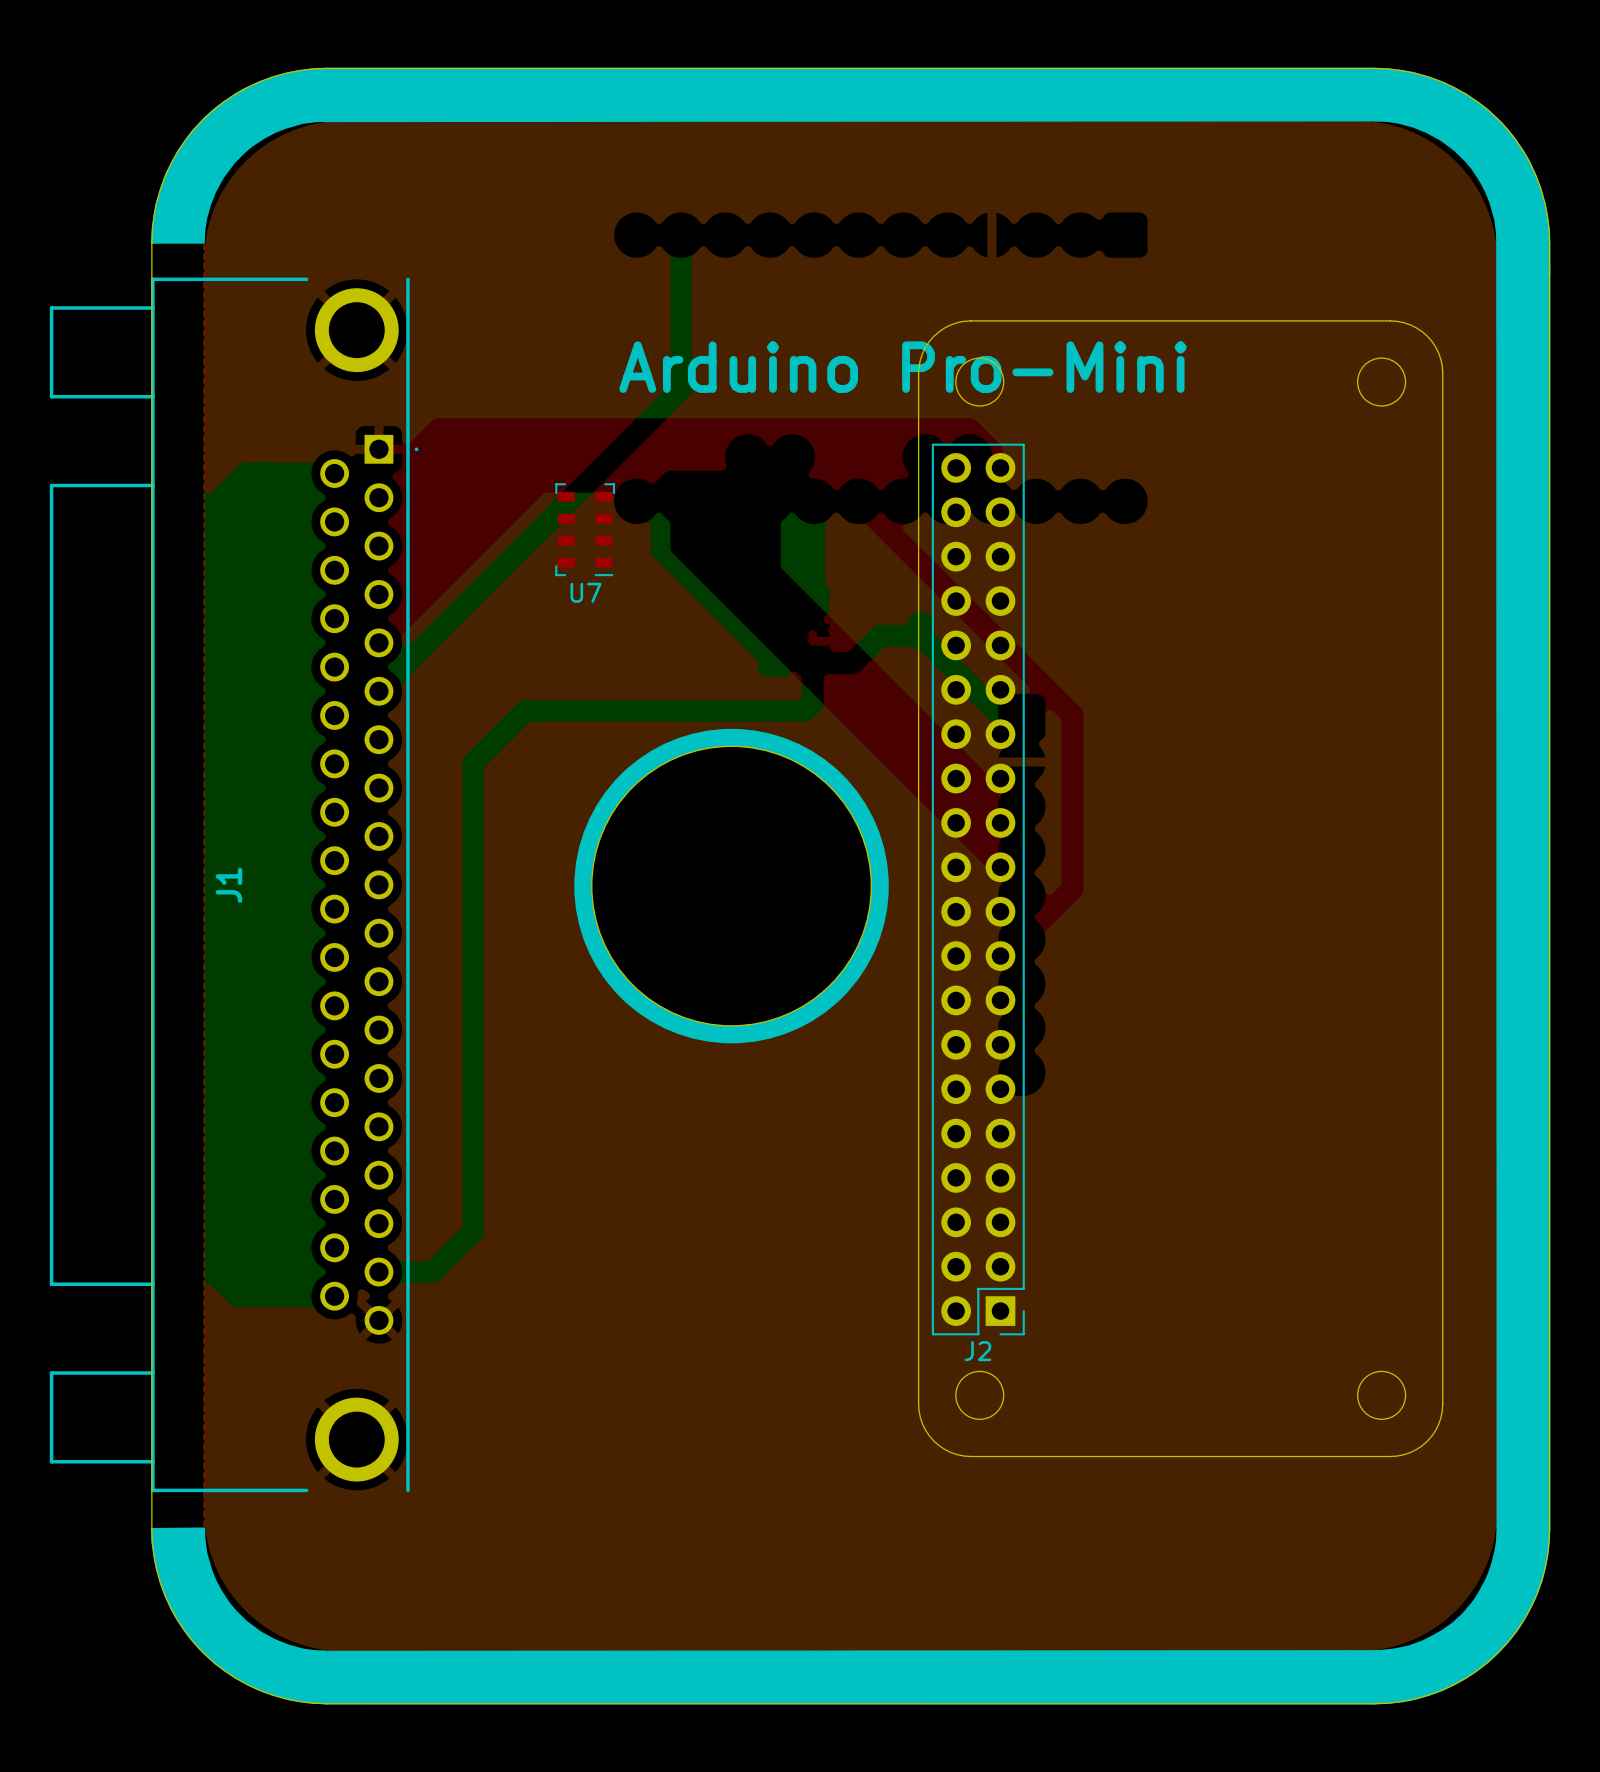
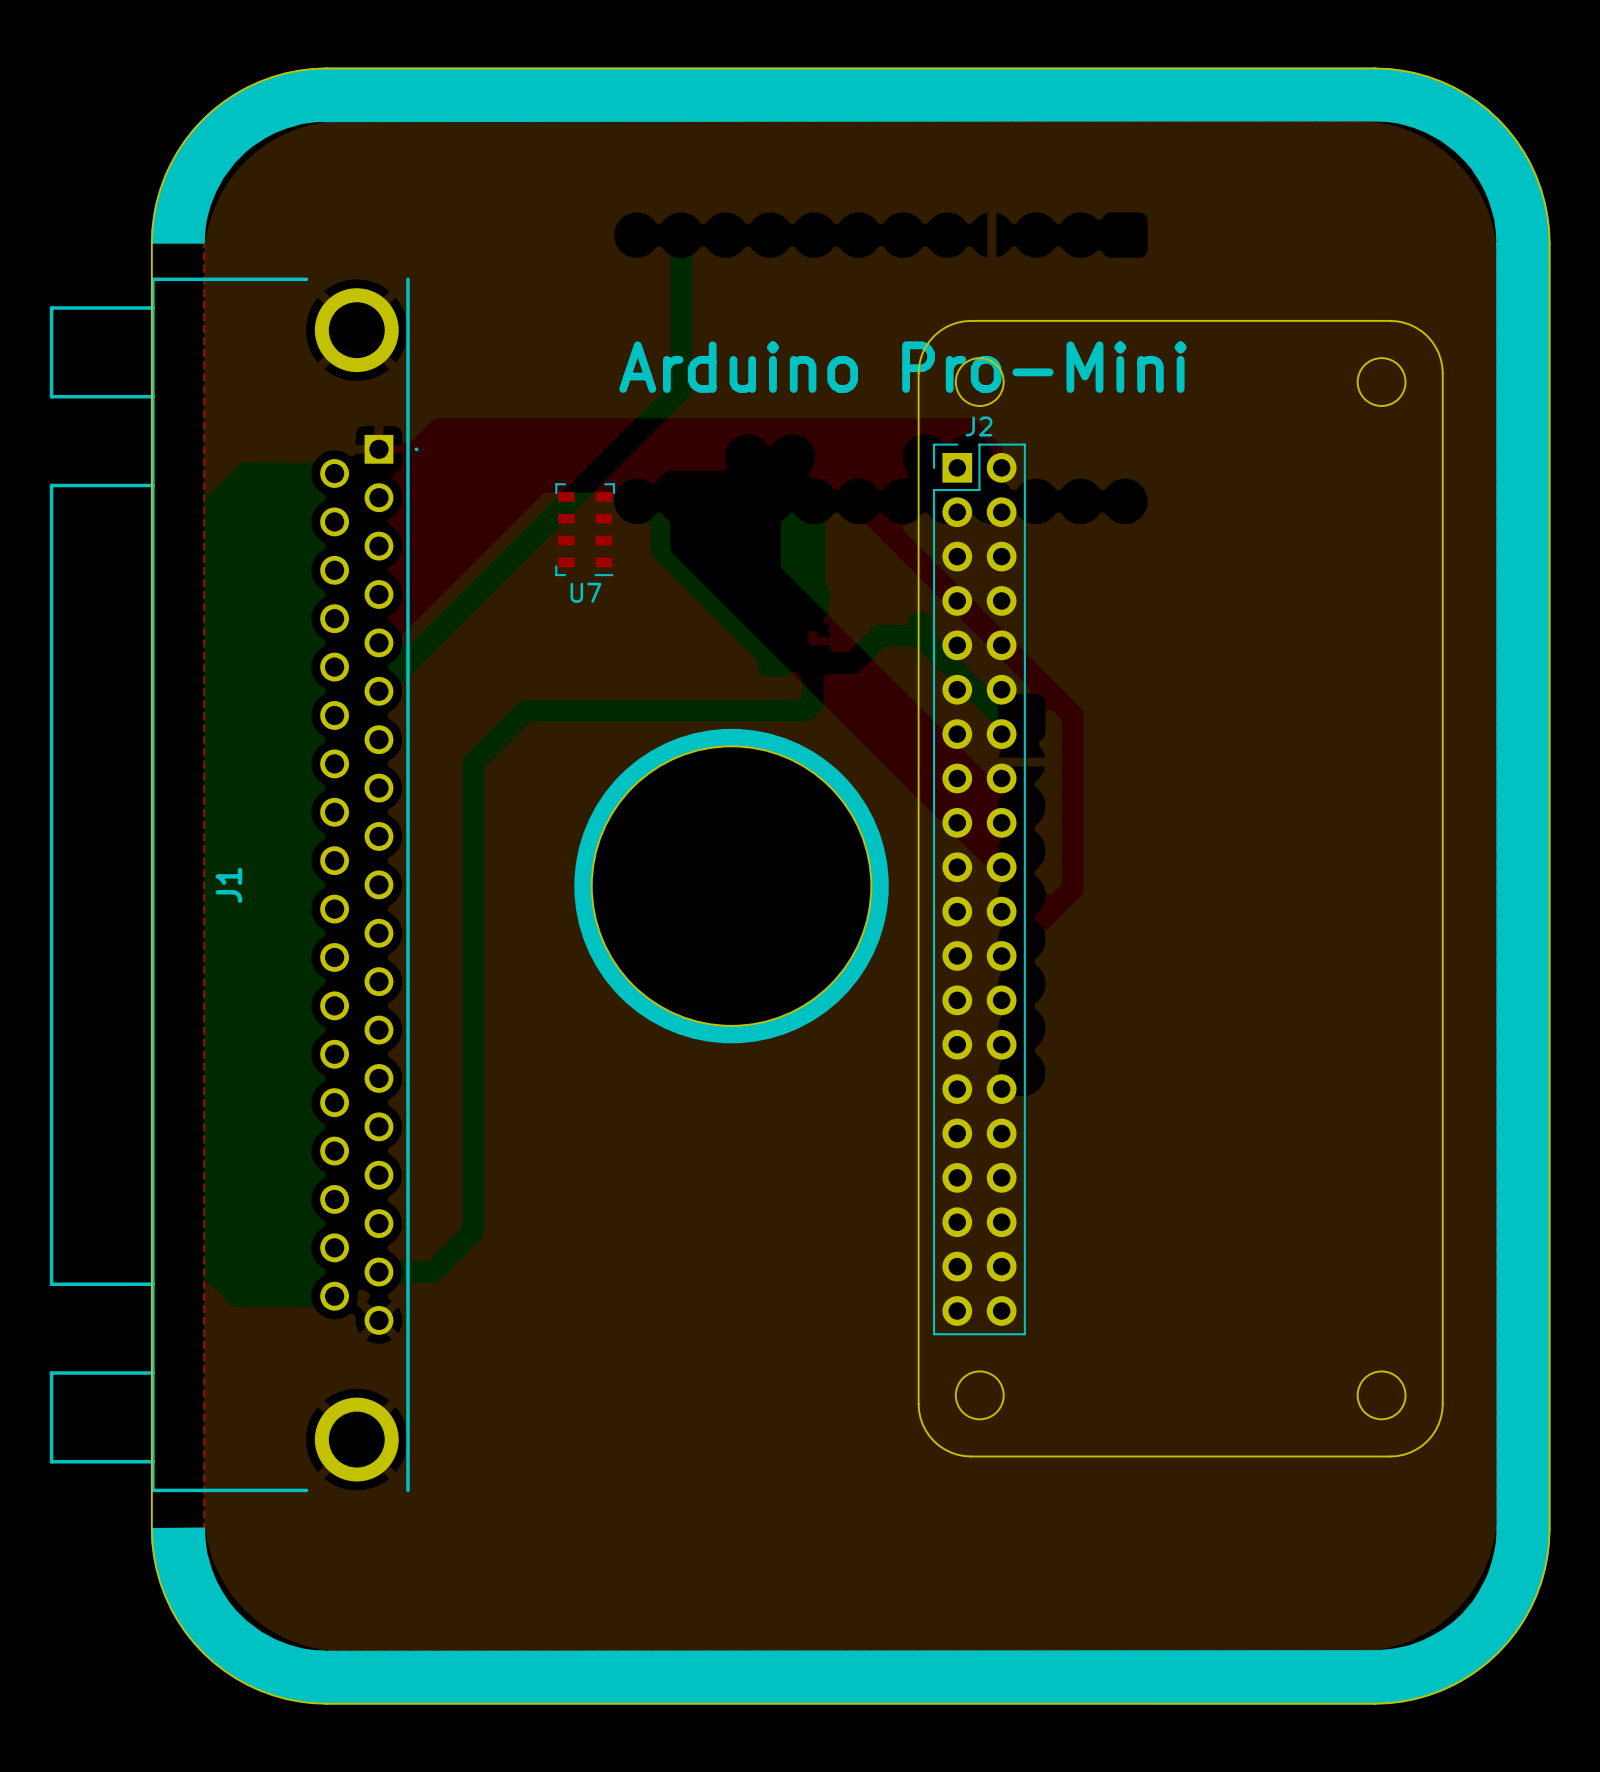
J2 rotation: 0° (978, 889) -> 180° (979, 889)

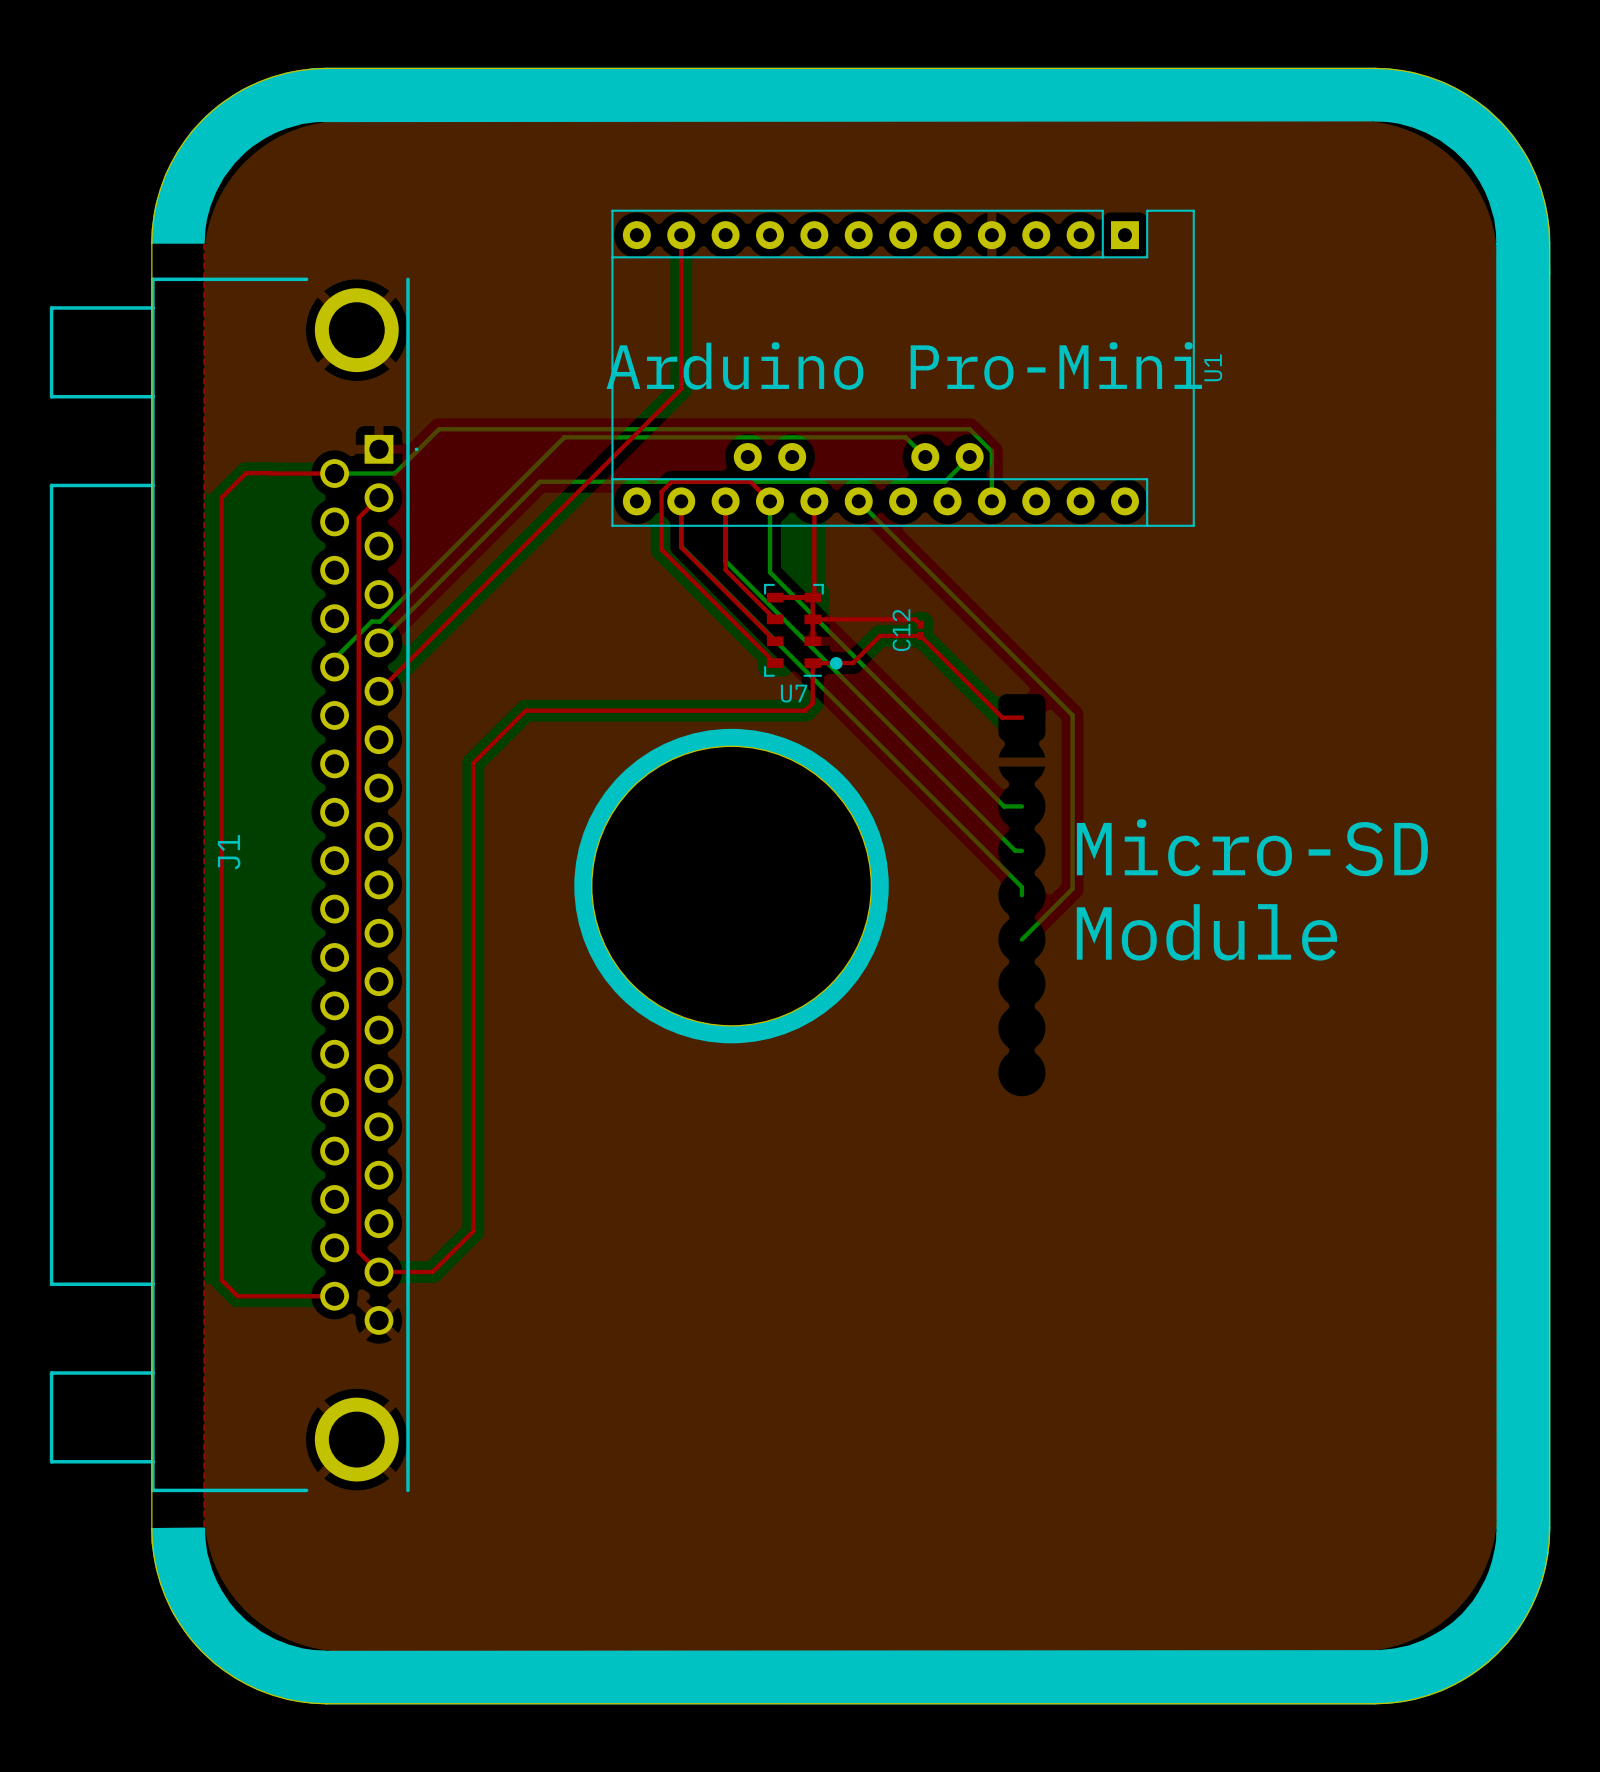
top track: none -> (681, 235) (681, 388) (378, 691)
board edge: (971, 320) (1397, 321) (1410, 324) (1422, 331) (1431, 341) (1438, 353) (1442, 373) (1442, 1404) (1440, 1417) (1431, 1436) (1422, 1445) (1410, 1452) (1390, 1456) (971, 1456) (950, 1452) (939, 1445) (929, 1436) (922, 1424) (918, 1404) (918, 373) (922, 353) (933, 336) (950, 324) (971, 320) -> none
round board edge: [955, 357, 1005, 407] -> none
round board edge: [1357, 357, 1406, 407] -> none
U1: none -> (903, 368)
bottom track: none -> (925, 457) (905, 437) (564, 437) (380, 621) (371, 621) (334, 658)
bottom track: none -> (969, 457) (944, 481) (539, 481) (378, 642)
bottom track: none -> (334, 473) (394, 473) (439, 429) (969, 429) (991, 451) (991, 501)
top track: none -> (334, 473) (246, 473) (221, 497) (221, 1280) (237, 1296) (334, 1296)
top track: none -> (378, 497) (358, 517) (358, 1251) (378, 1272) (432, 1272) (473, 1231) (473, 763) (525, 710) (805, 710) (812, 703) (812, 663) (852, 663) (880, 635) (920, 635) (1002, 717) (1021, 717)
bottom track: none -> (681, 501) (681, 546) (1021, 887) (1021, 895)
top track: none -> (681, 501) (681, 547) (775, 641)
bottom track: none -> (725, 501) (725, 561) (1015, 850) (1021, 850)
top track: none -> (725, 501) (725, 569) (775, 619)
bottom track: none -> (769, 501) (769, 572) (1004, 806) (1021, 806)
top track: none -> (769, 501) (750, 481) (671, 481) (661, 491) (661, 549) (775, 663)
top track: none -> (814, 501) (814, 595) (812, 597)
bottom track: none -> (858, 501) (1072, 715) (1072, 888) (1021, 939)
U7 position: (585, 529) -> (793, 630)
top track: none -> (775, 597) (812, 597)
top track: none -> (812, 597) (812, 641)
top track: none -> (812, 619) (915, 619) (920, 624)
C12: none -> (920, 630)
drawing: none -> [829, 657, 843, 670]
text: none -> Micro-SD (1252, 847)
J1 name position: J1 (228, 885) -> J1 (229, 852)
J2: (979, 889) -> none
text: none -> Module (1206, 932)
round board edge: [955, 1370, 1005, 1420] -> none
round board edge: [1357, 1370, 1406, 1420] -> none

